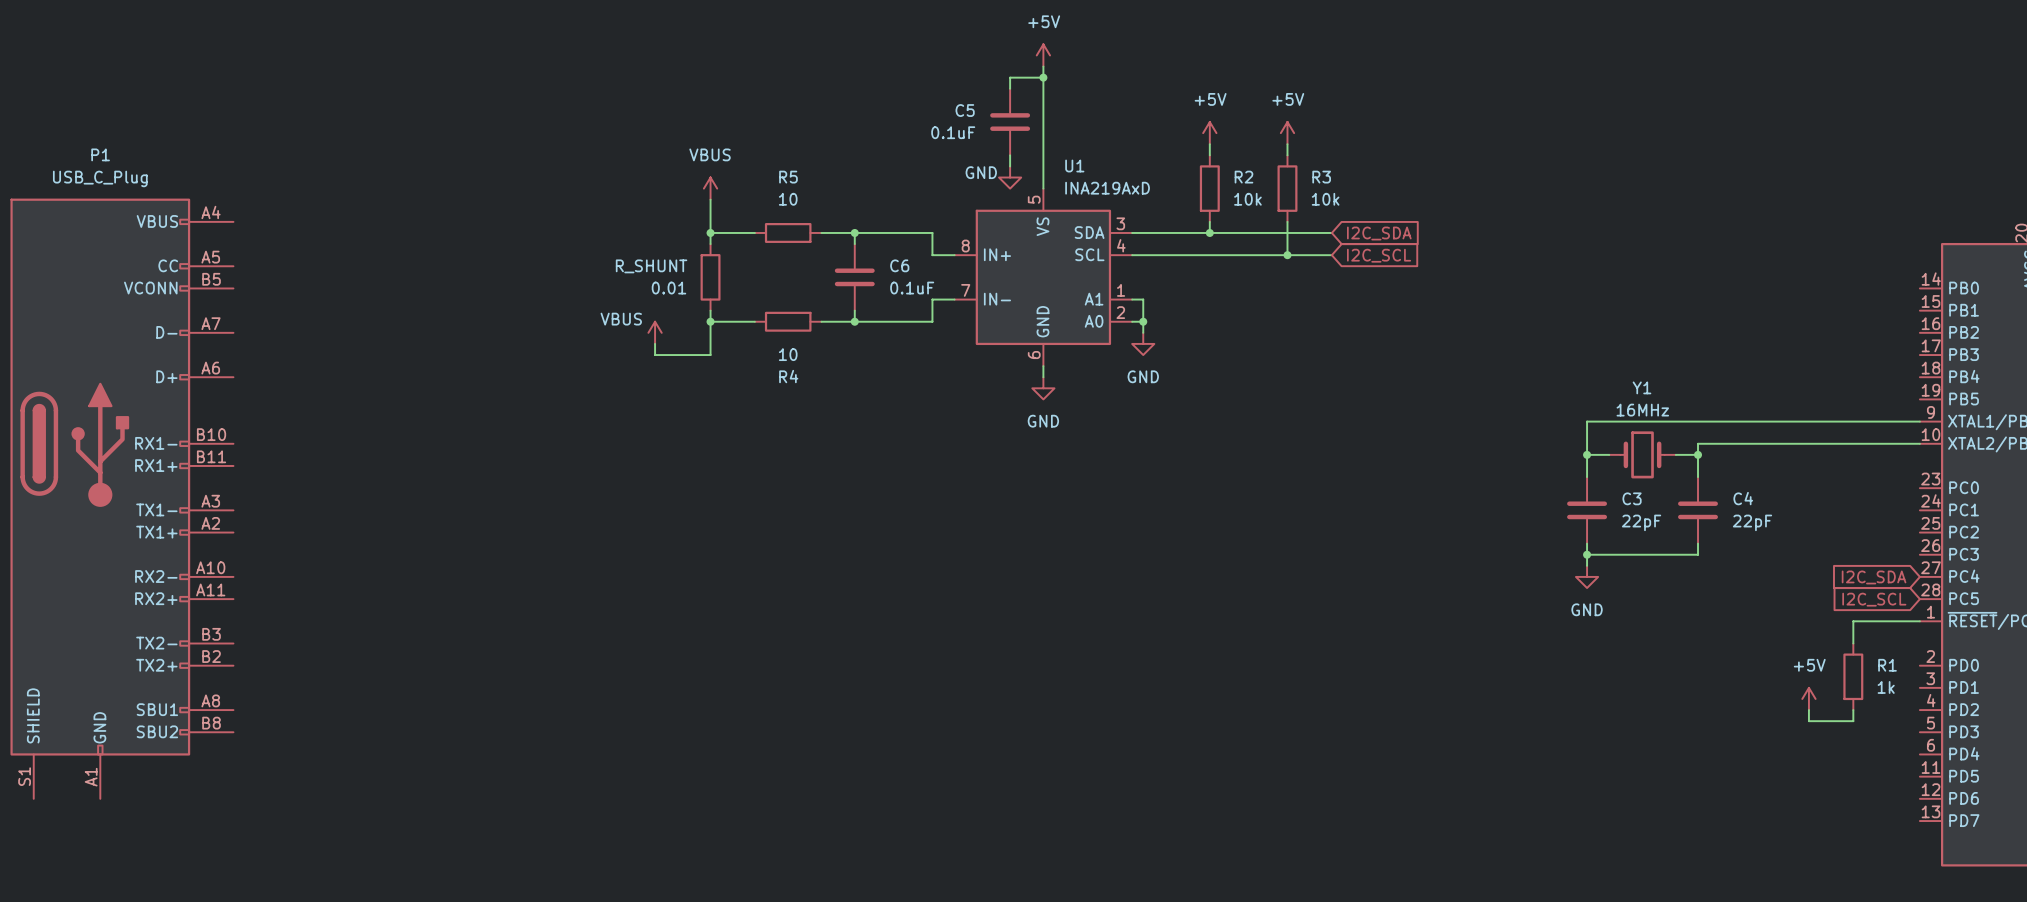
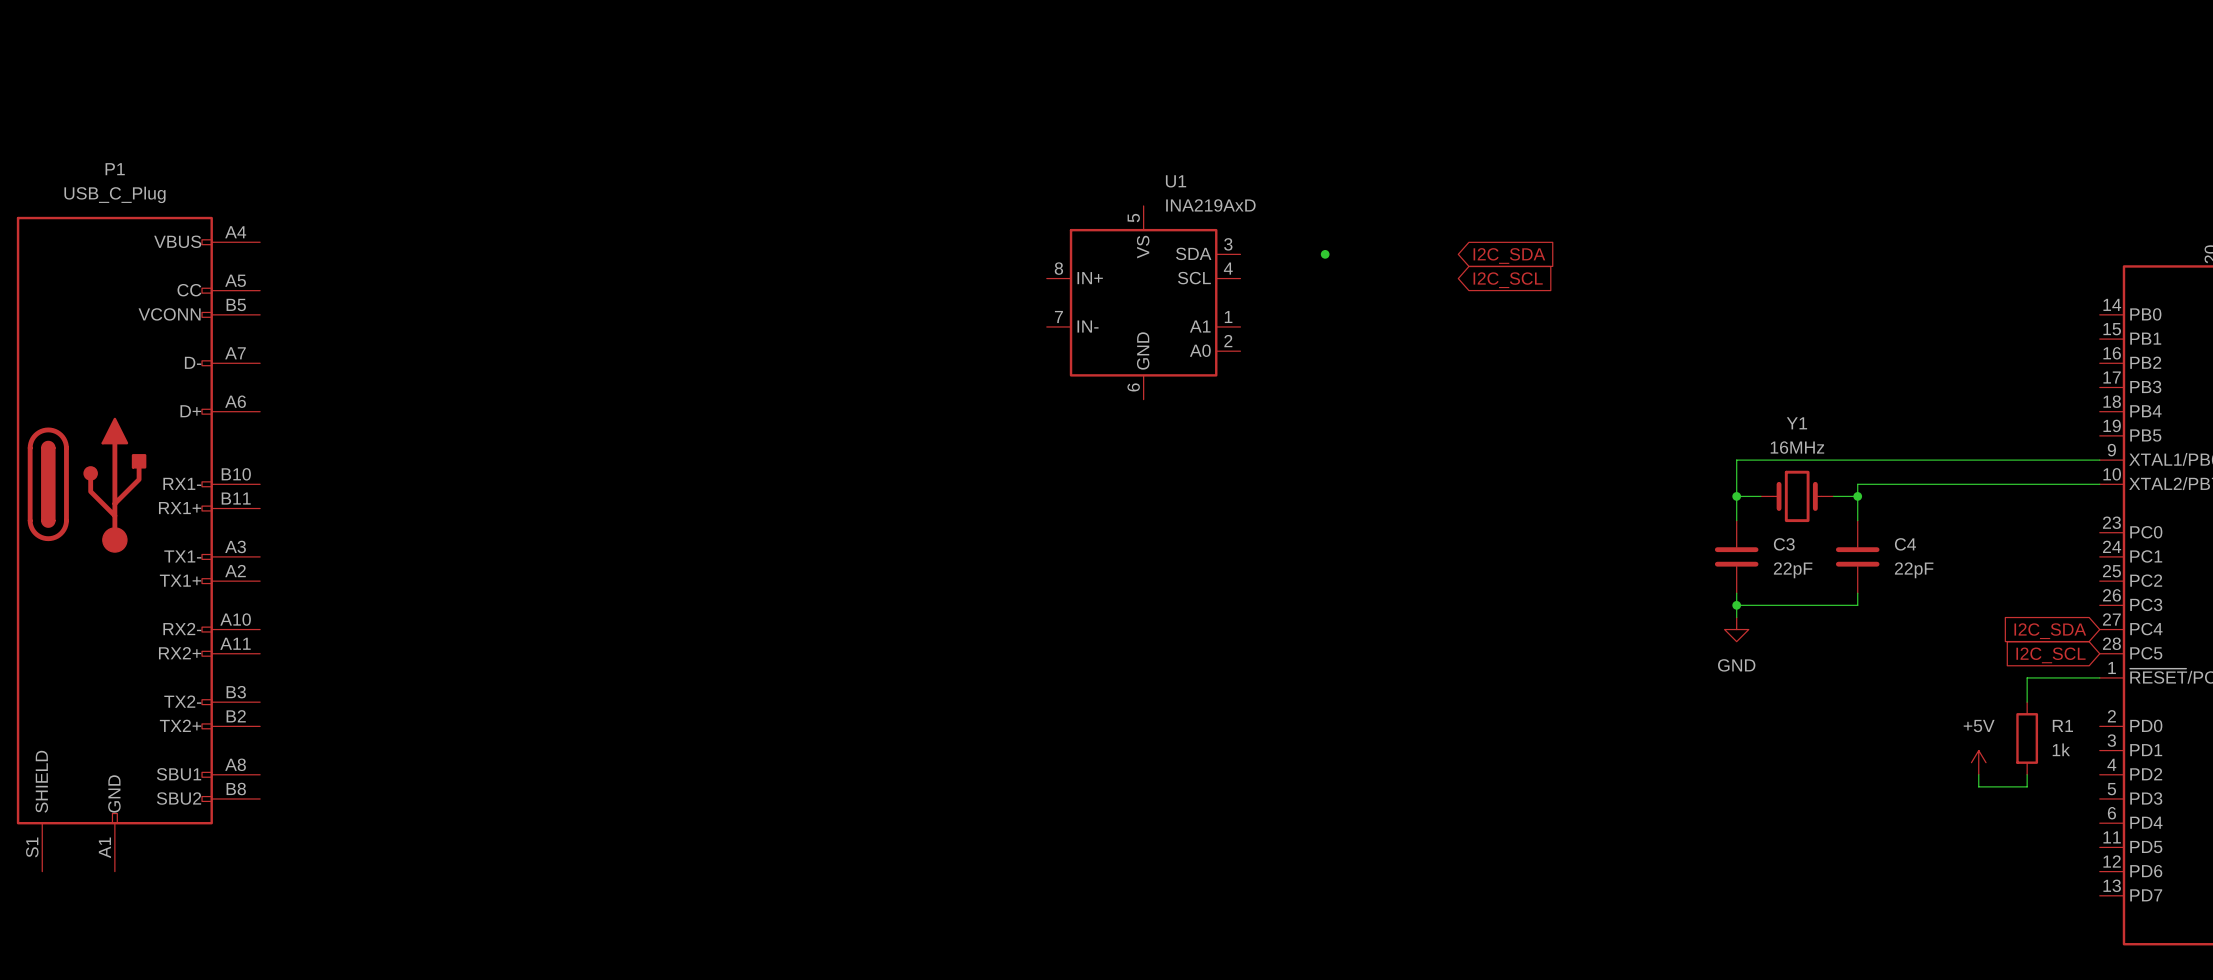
power symbol: +5V (1043, 55) -> none
wire: (1043, 66) (1043, 188) -> none
wire: (1043, 77) (1010, 77) (1010, 88) -> none
junction: (1043, 77) -> none
C5: 0.1uF (1010, 122) -> none
power symbol: +5V (1209, 133) -> none
power symbol: +5V (1287, 133) -> none
wire: (1209, 144) (1209, 155) -> none
wire: (1287, 144) (1287, 155) -> none
wire: (1010, 155) (1010, 166) -> none
power symbol: GND (1010, 177) -> none
power symbol: VBUS (710, 188) -> none
R2: 10k (1209, 188) -> none
R3: 10k (1287, 188) -> none
wire: (710, 199) (710, 244) -> none
wire: (1209, 221) (1209, 232) -> none
wire: (1287, 221) (1287, 255) -> none
wire: (710, 232) (754, 232) -> none
junction: (710, 232) -> none
R5: 10 (788, 232) -> none
wire: (821, 232) (932, 232) (932, 255) (954, 255) -> none
wire: (854, 232) (854, 244) -> none
junction: (854, 232) -> none
wire: (1132, 232) (1331, 232) -> none
wire: (1132, 255) (1331, 255) -> none
junction: (1287, 255) -> none
R_SHUNT: 0.01 (710, 277) -> none
C6: 0.1uF (854, 277) -> none
wire: (954, 299) (932, 299) (932, 321) (821, 321) -> none
wire: (1132, 299) (1143, 299) (1143, 332) -> none
wire: (710, 310) (710, 355) (655, 355) (655, 343) -> none
wire: (854, 310) (854, 321) -> none
wire: (710, 321) (754, 321) -> none
junction: (710, 321) -> none
R4: 10 (788, 321) -> none
junction: (854, 321) -> none
wire: (1132, 321) (1143, 321) -> none
junction: (1143, 321) -> none
power symbol: VBUS (655, 332) -> none
power symbol: GND (1143, 343) -> none
wire: (1043, 366) (1043, 377) -> none
power symbol: GND (1043, 388) -> none

